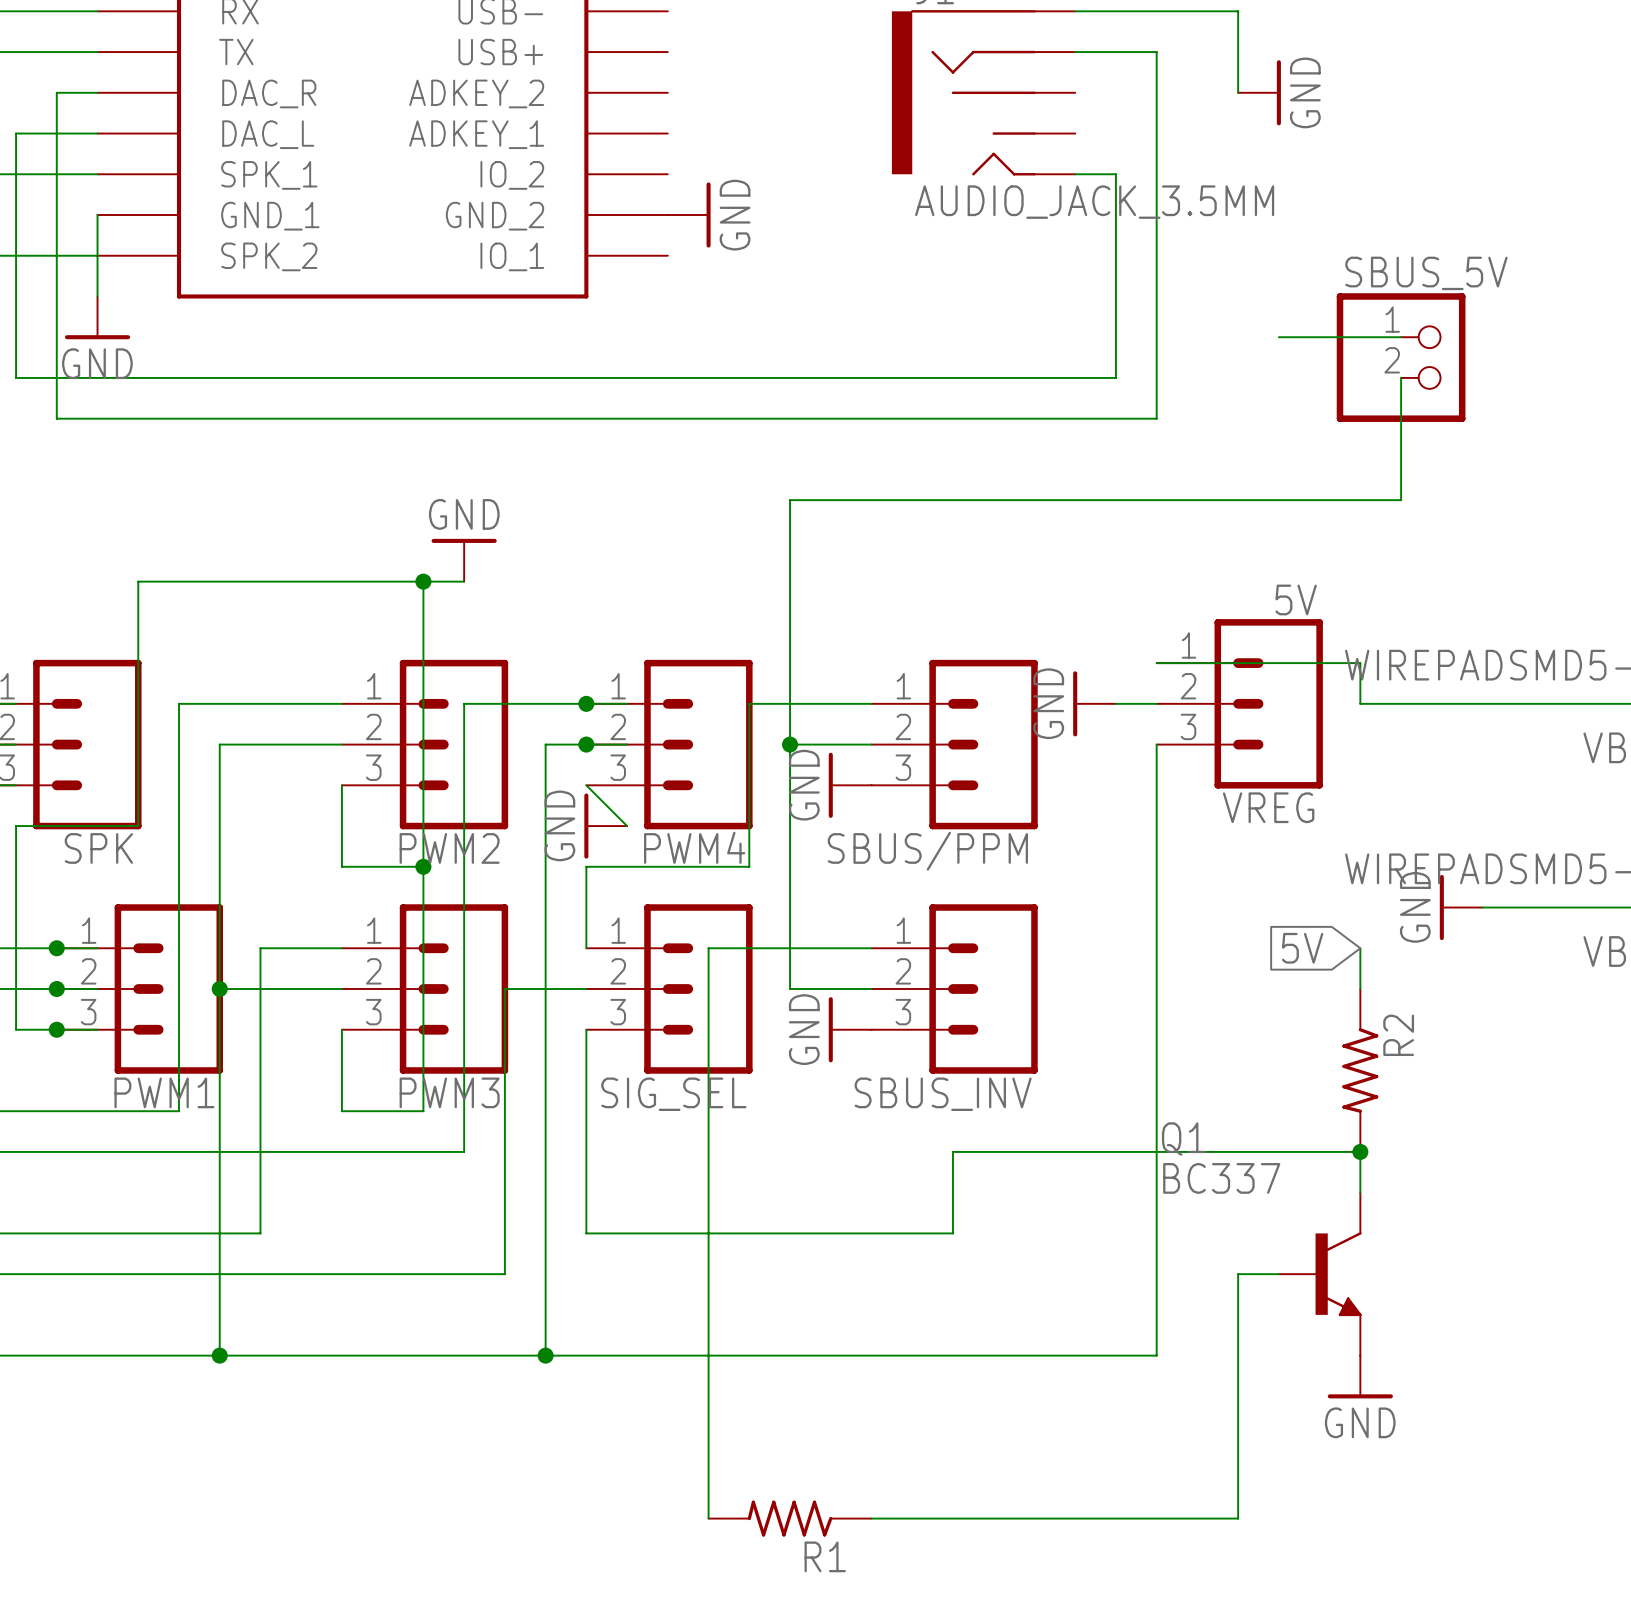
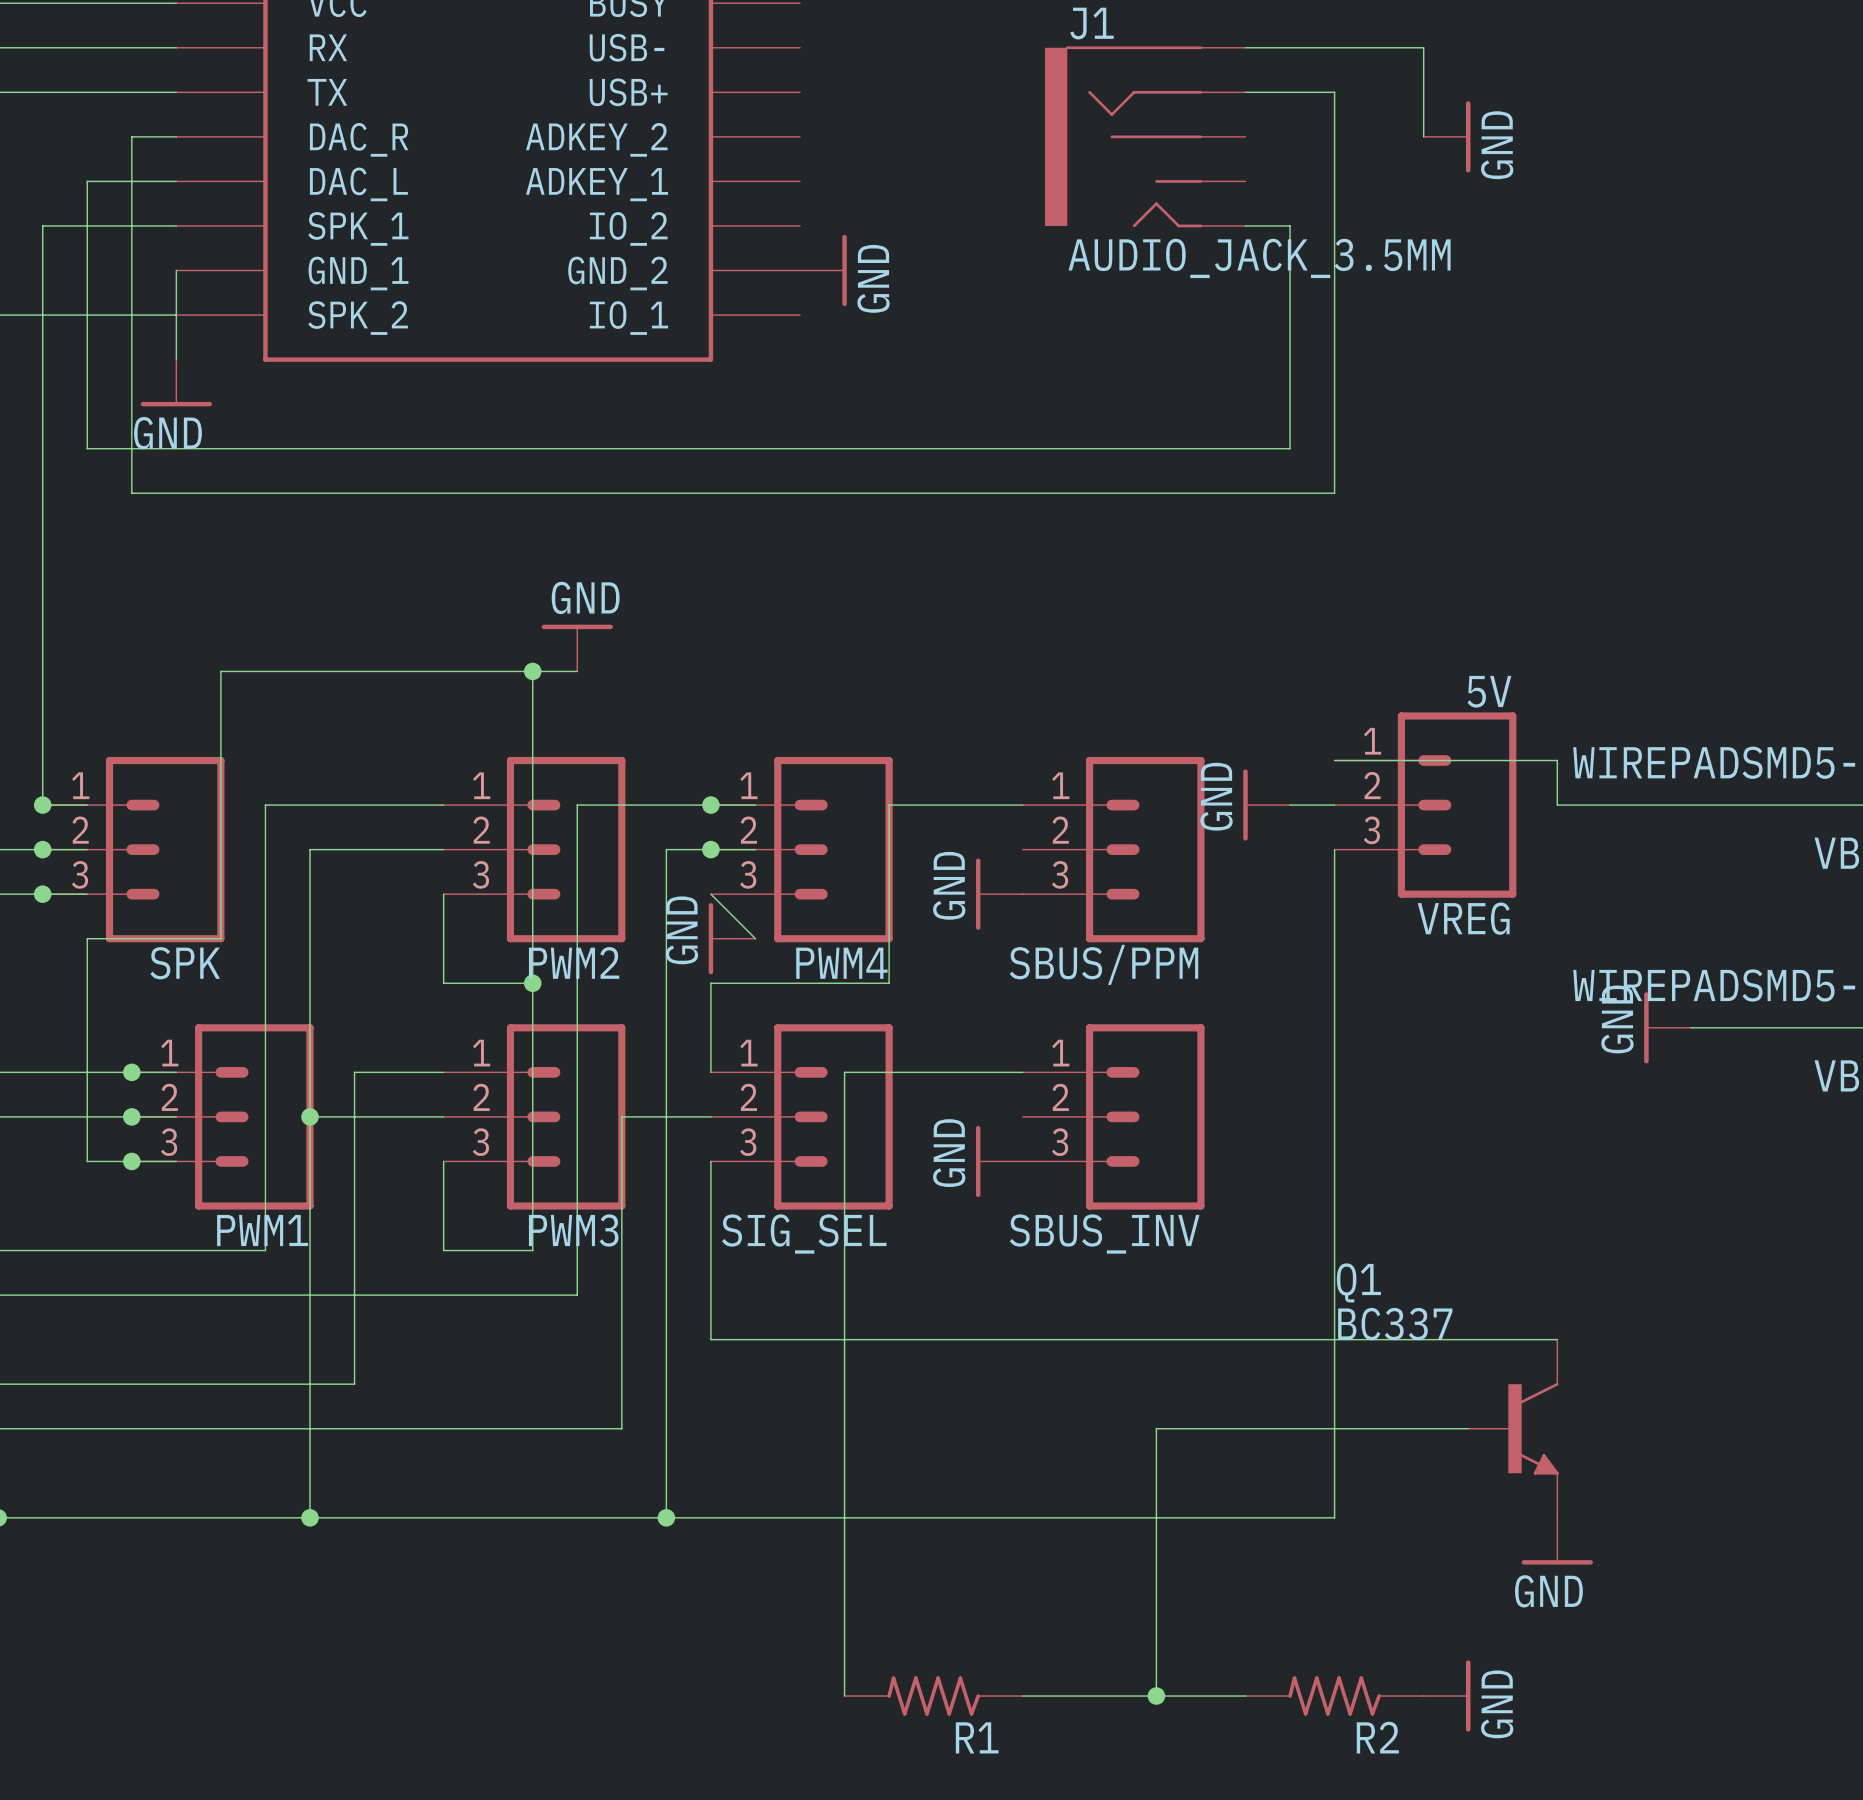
wire: (1278, 337) (1401, 337) -> none
SBUS_5V: (1401, 357) -> none
wire: (1401, 377) (1401, 500) (790, 500) (790, 989) (871, 989) -> none
wire: (790, 744) (871, 744) -> none
junction: (790, 744) -> none
global label: 5V (1302, 948) -> none
wire: (1360, 948) (1360, 989) -> none
R2 rotation: 0° (1360, 1070) -> 90° clockwise (1334, 1696)
R2 position: (1360, 1070) -> (1334, 1696)
junction: (1360, 1151) -> none
wire: (586, 1192) (586, 1233) (952, 1233) (952, 1151) (1360, 1151) (1360, 1192) -> (710, 1339) (1557, 1339)
wire: (1238, 1274) (1238, 1518) (1075, 1518) -> (1423, 1428) (1156, 1428) (1156, 1696)
junction: none -> (1156, 1696)
power symbol: none -> GND (1447, 1696)

